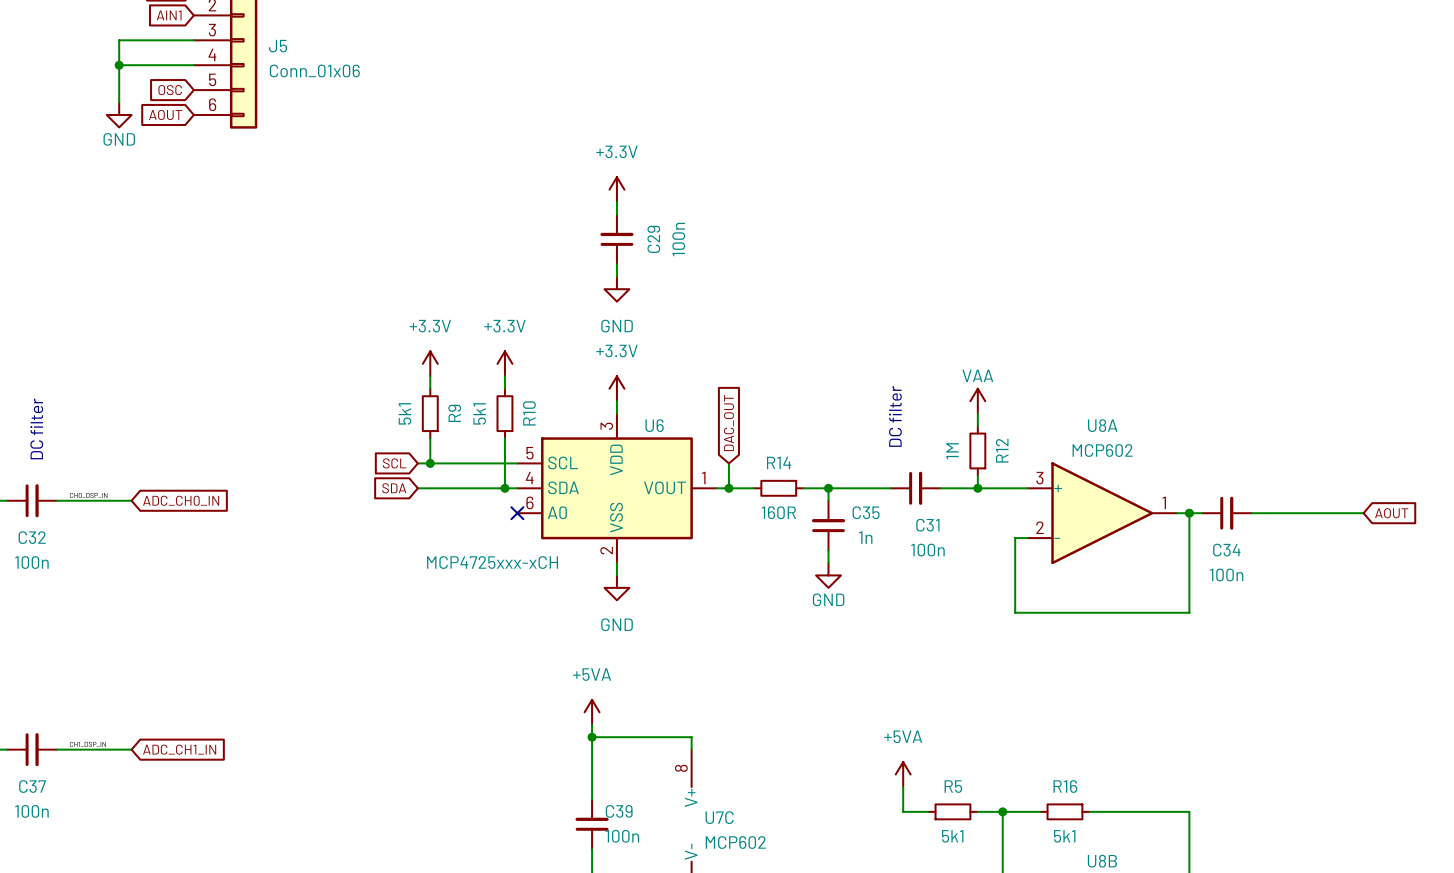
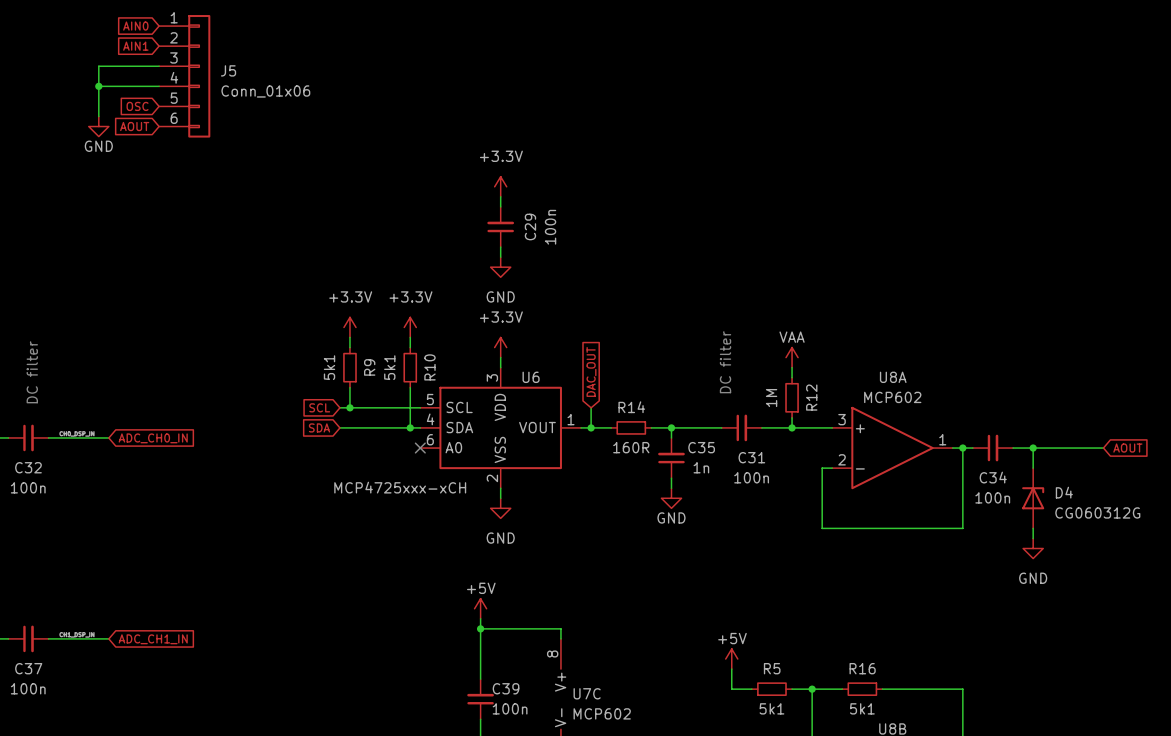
wire: none -> (1033, 448) (1033, 468)
junction: none -> (1033, 448)
D4: none -> CG060312G (1033, 498)
wire: none -> (1033, 528) (1033, 538)
power symbol: none -> GND (1033, 548)
power symbol: +5VA (592, 712) -> +5V (480, 608)
power symbol: +5VA (903, 774) -> +5V (731, 659)

